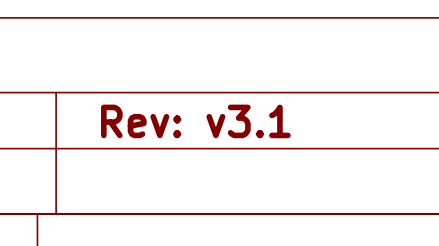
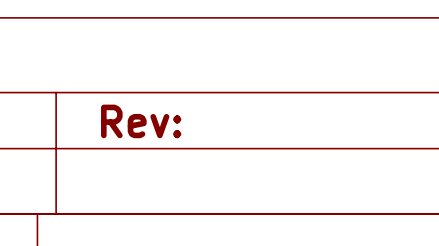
title block: Rev: v3.1 (195, 121) -> Rev: (141, 121)

